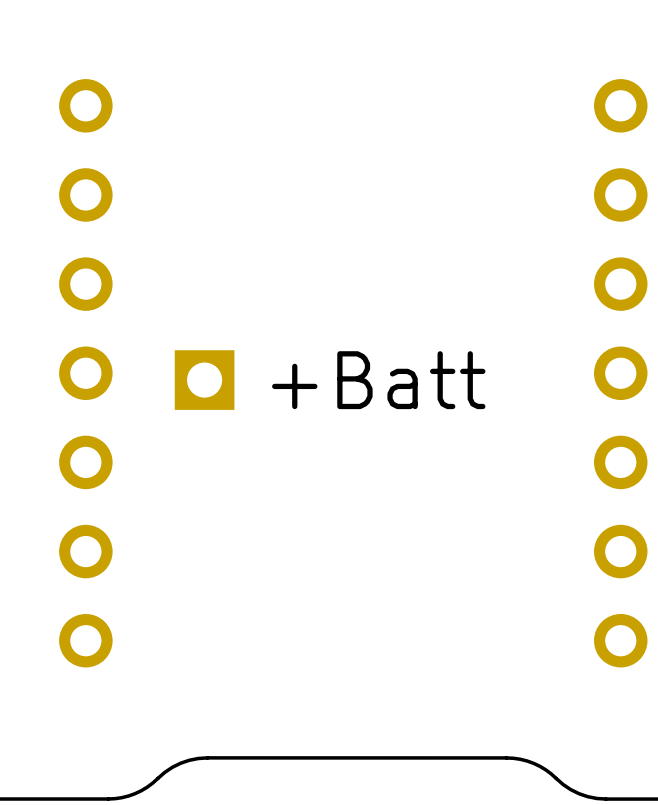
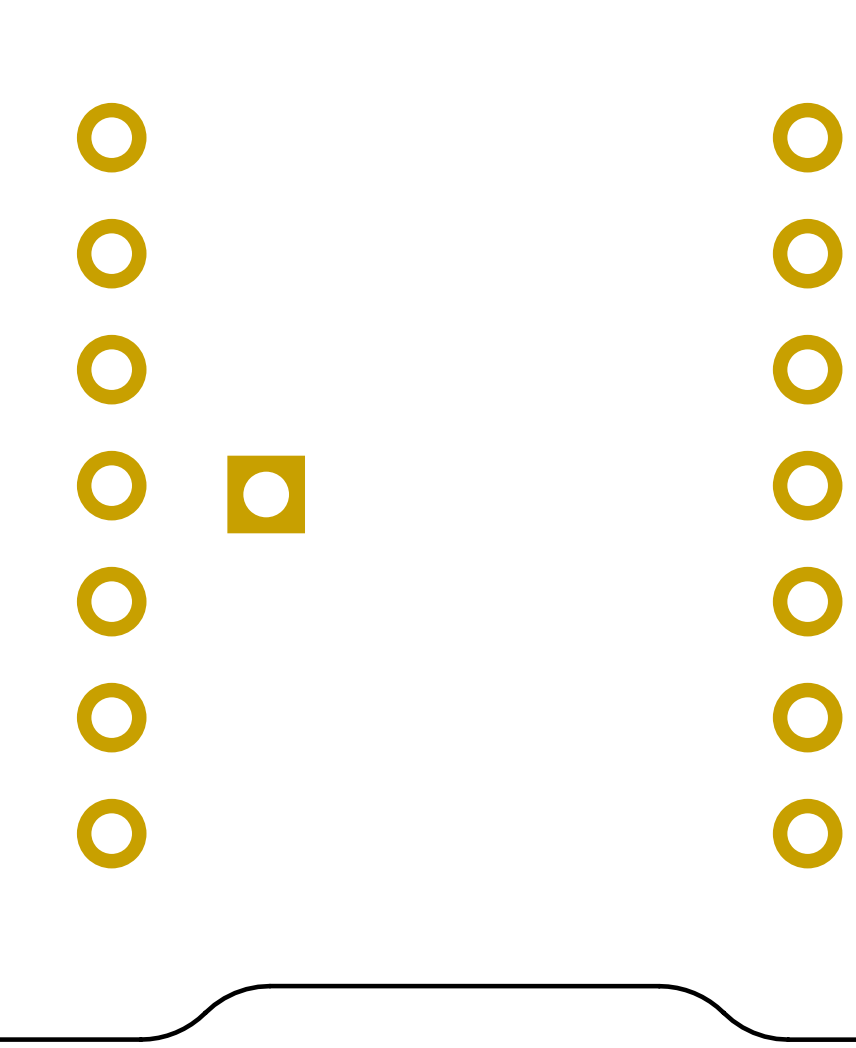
text: +Batt (378, 380) -> none

